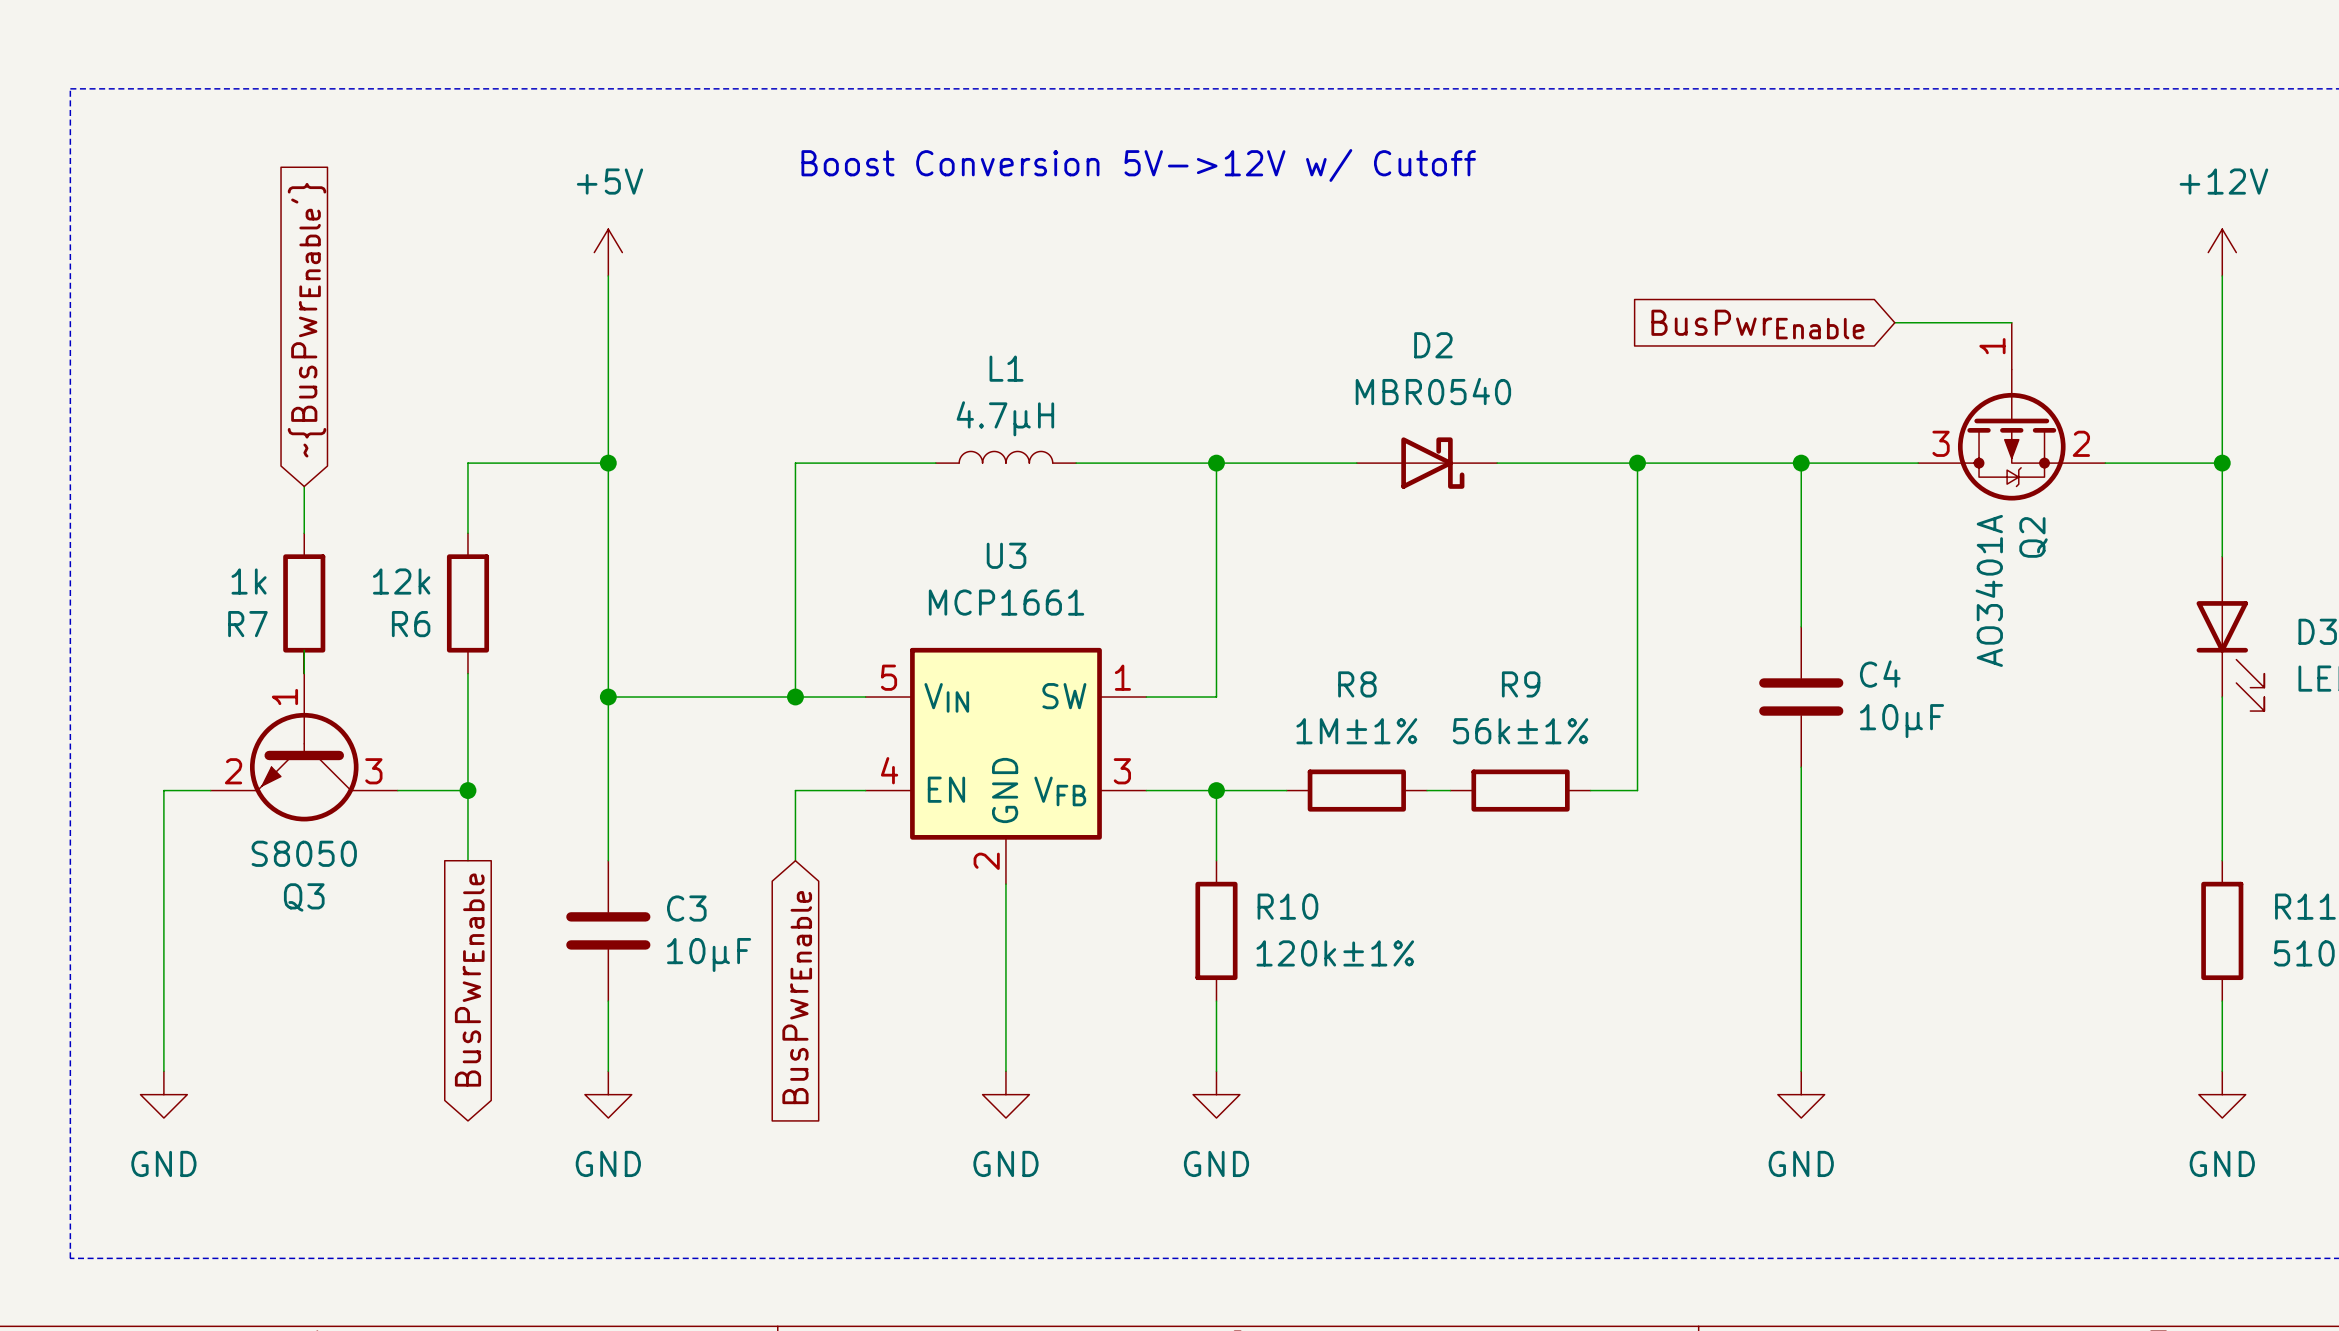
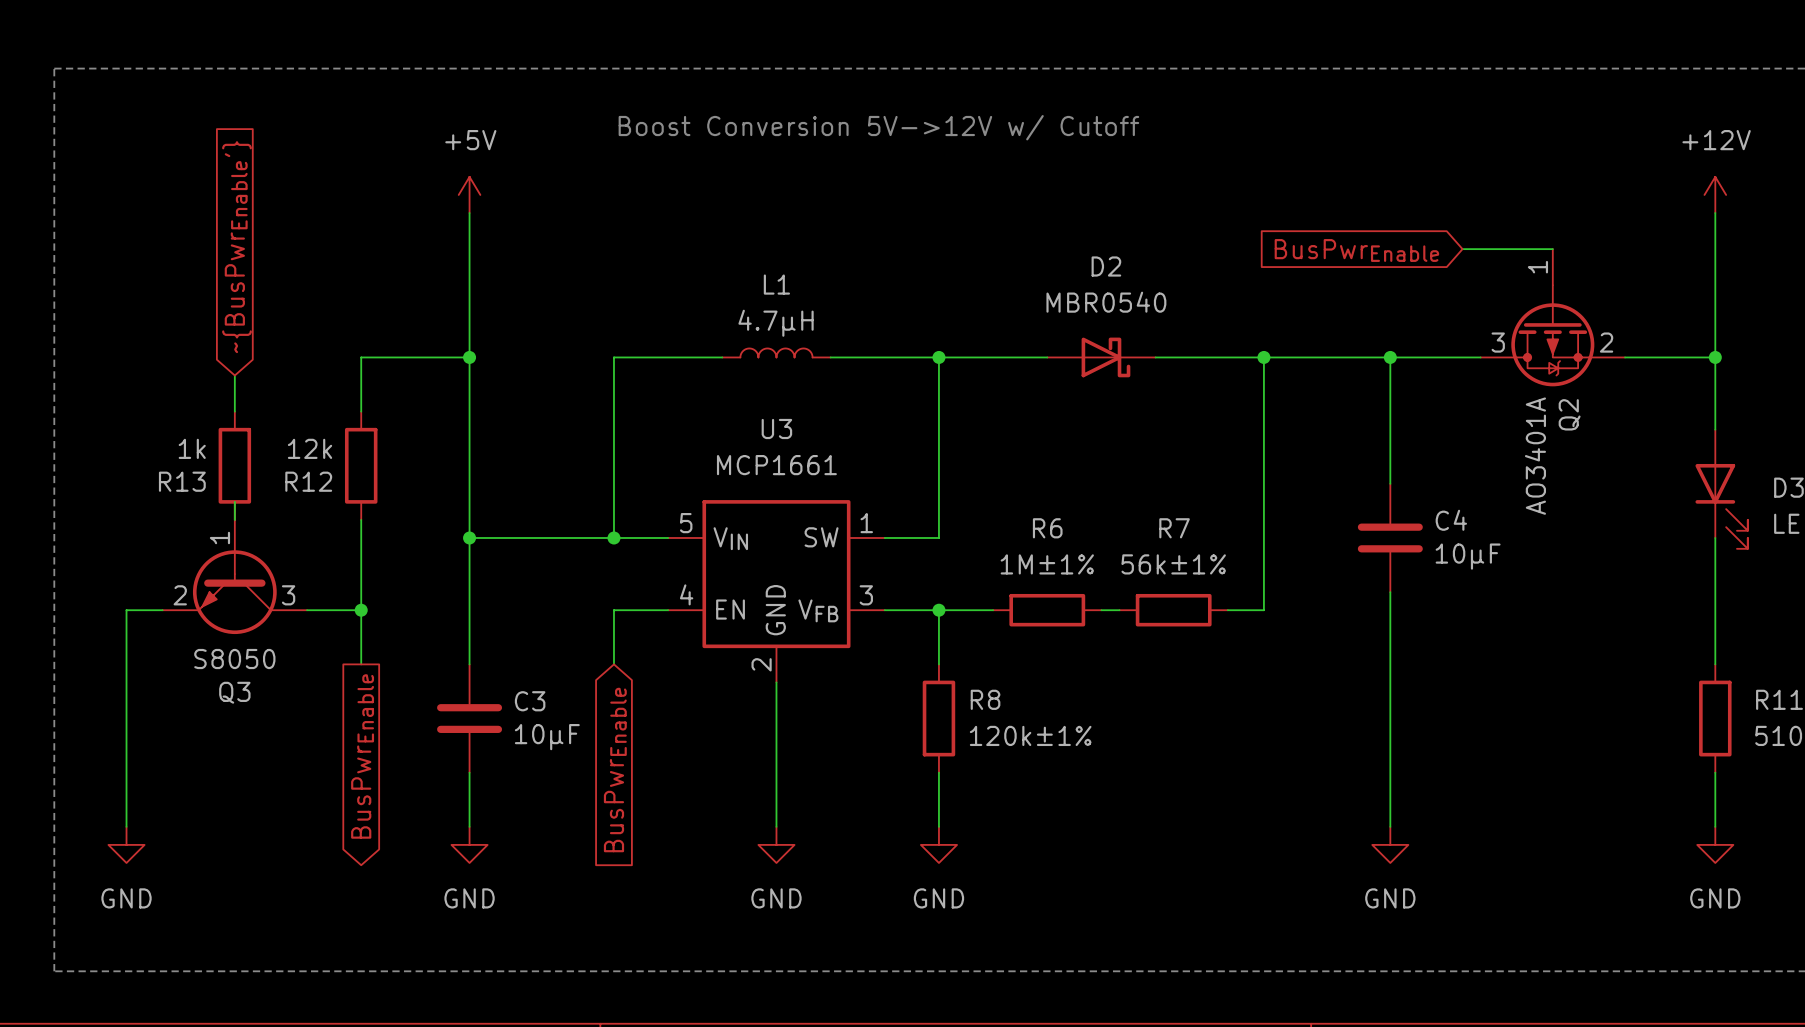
R7 name: R7 (247, 624) -> R13 (182, 481)
R6 name: R6 (411, 624) -> R12 (308, 481)
R8 name: R8 (1357, 684) -> R6 (1047, 528)
R9 name: R9 (1521, 684) -> R7 (1174, 528)
R10 name: R10 (1287, 906) -> R8 (985, 699)

